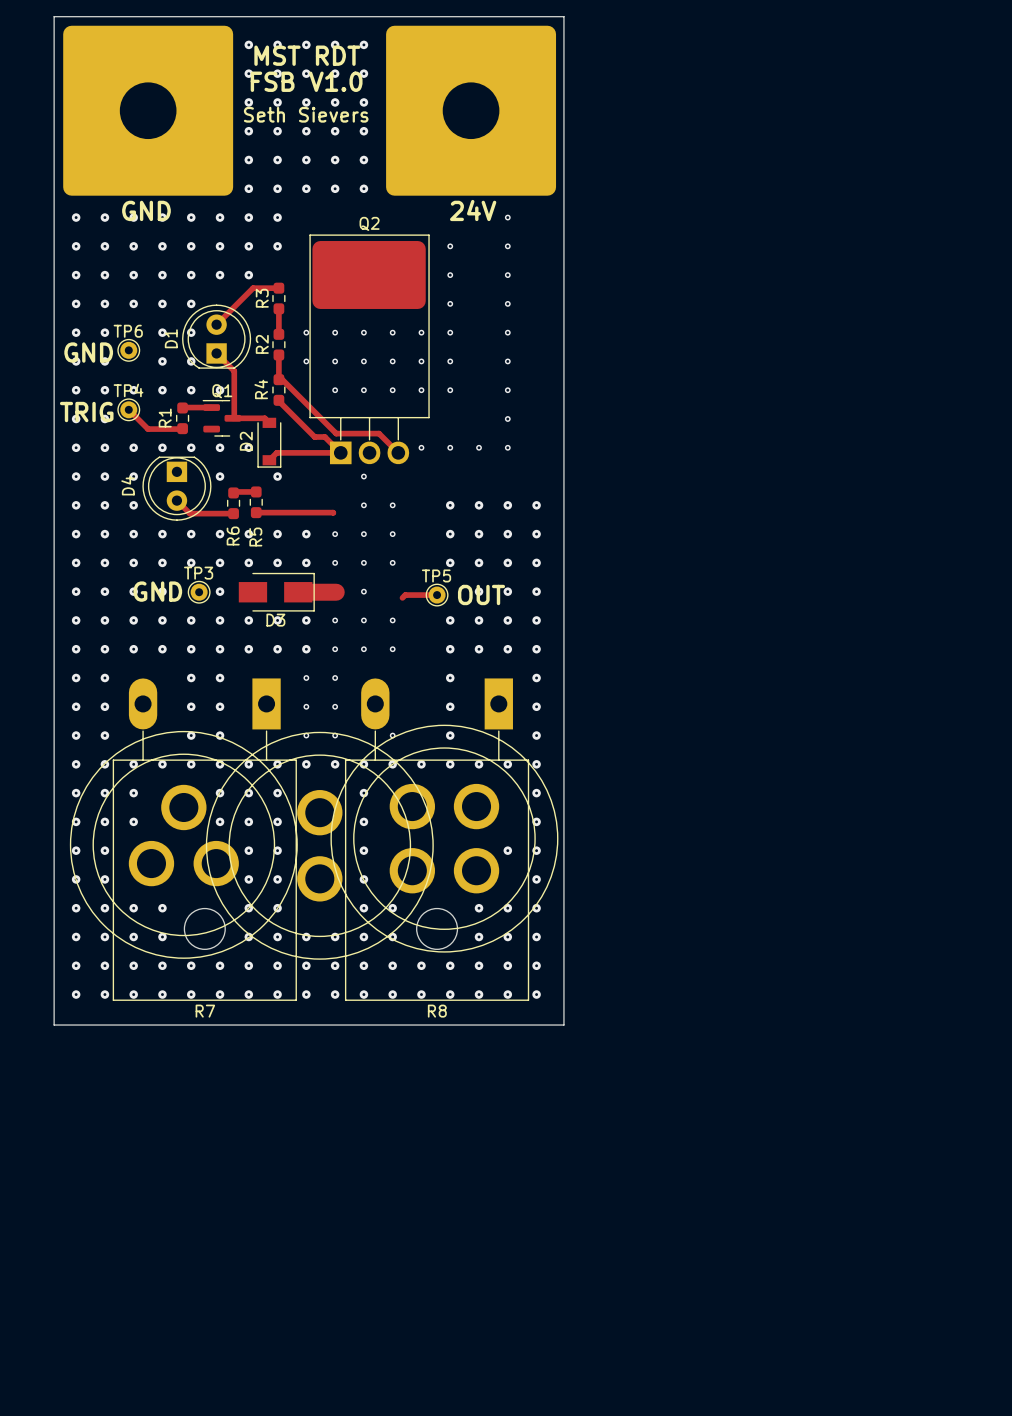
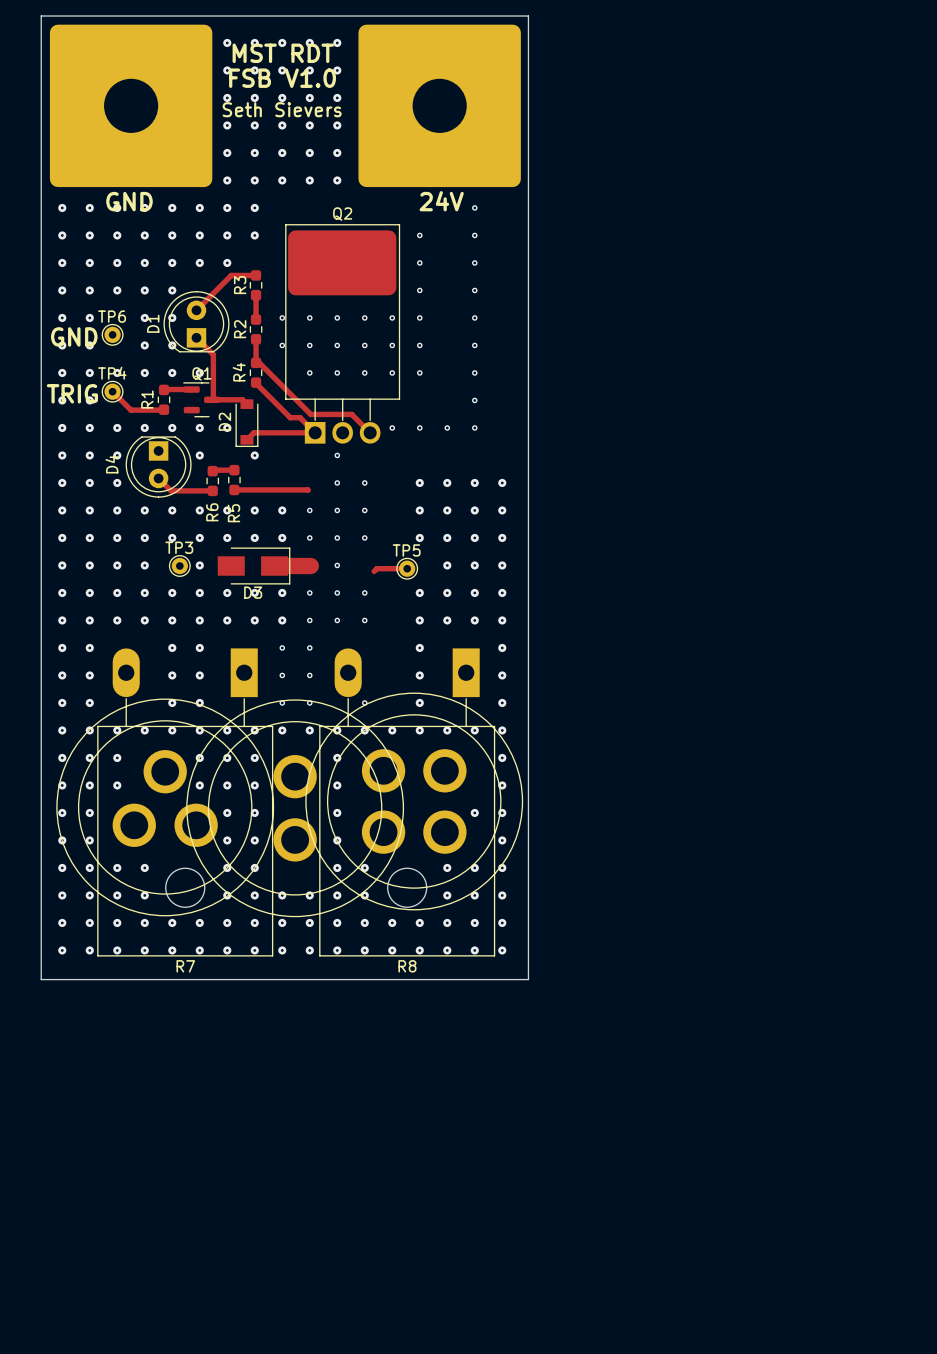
text: GND (157, 591) -> none
text: OUT (481, 594) -> none

